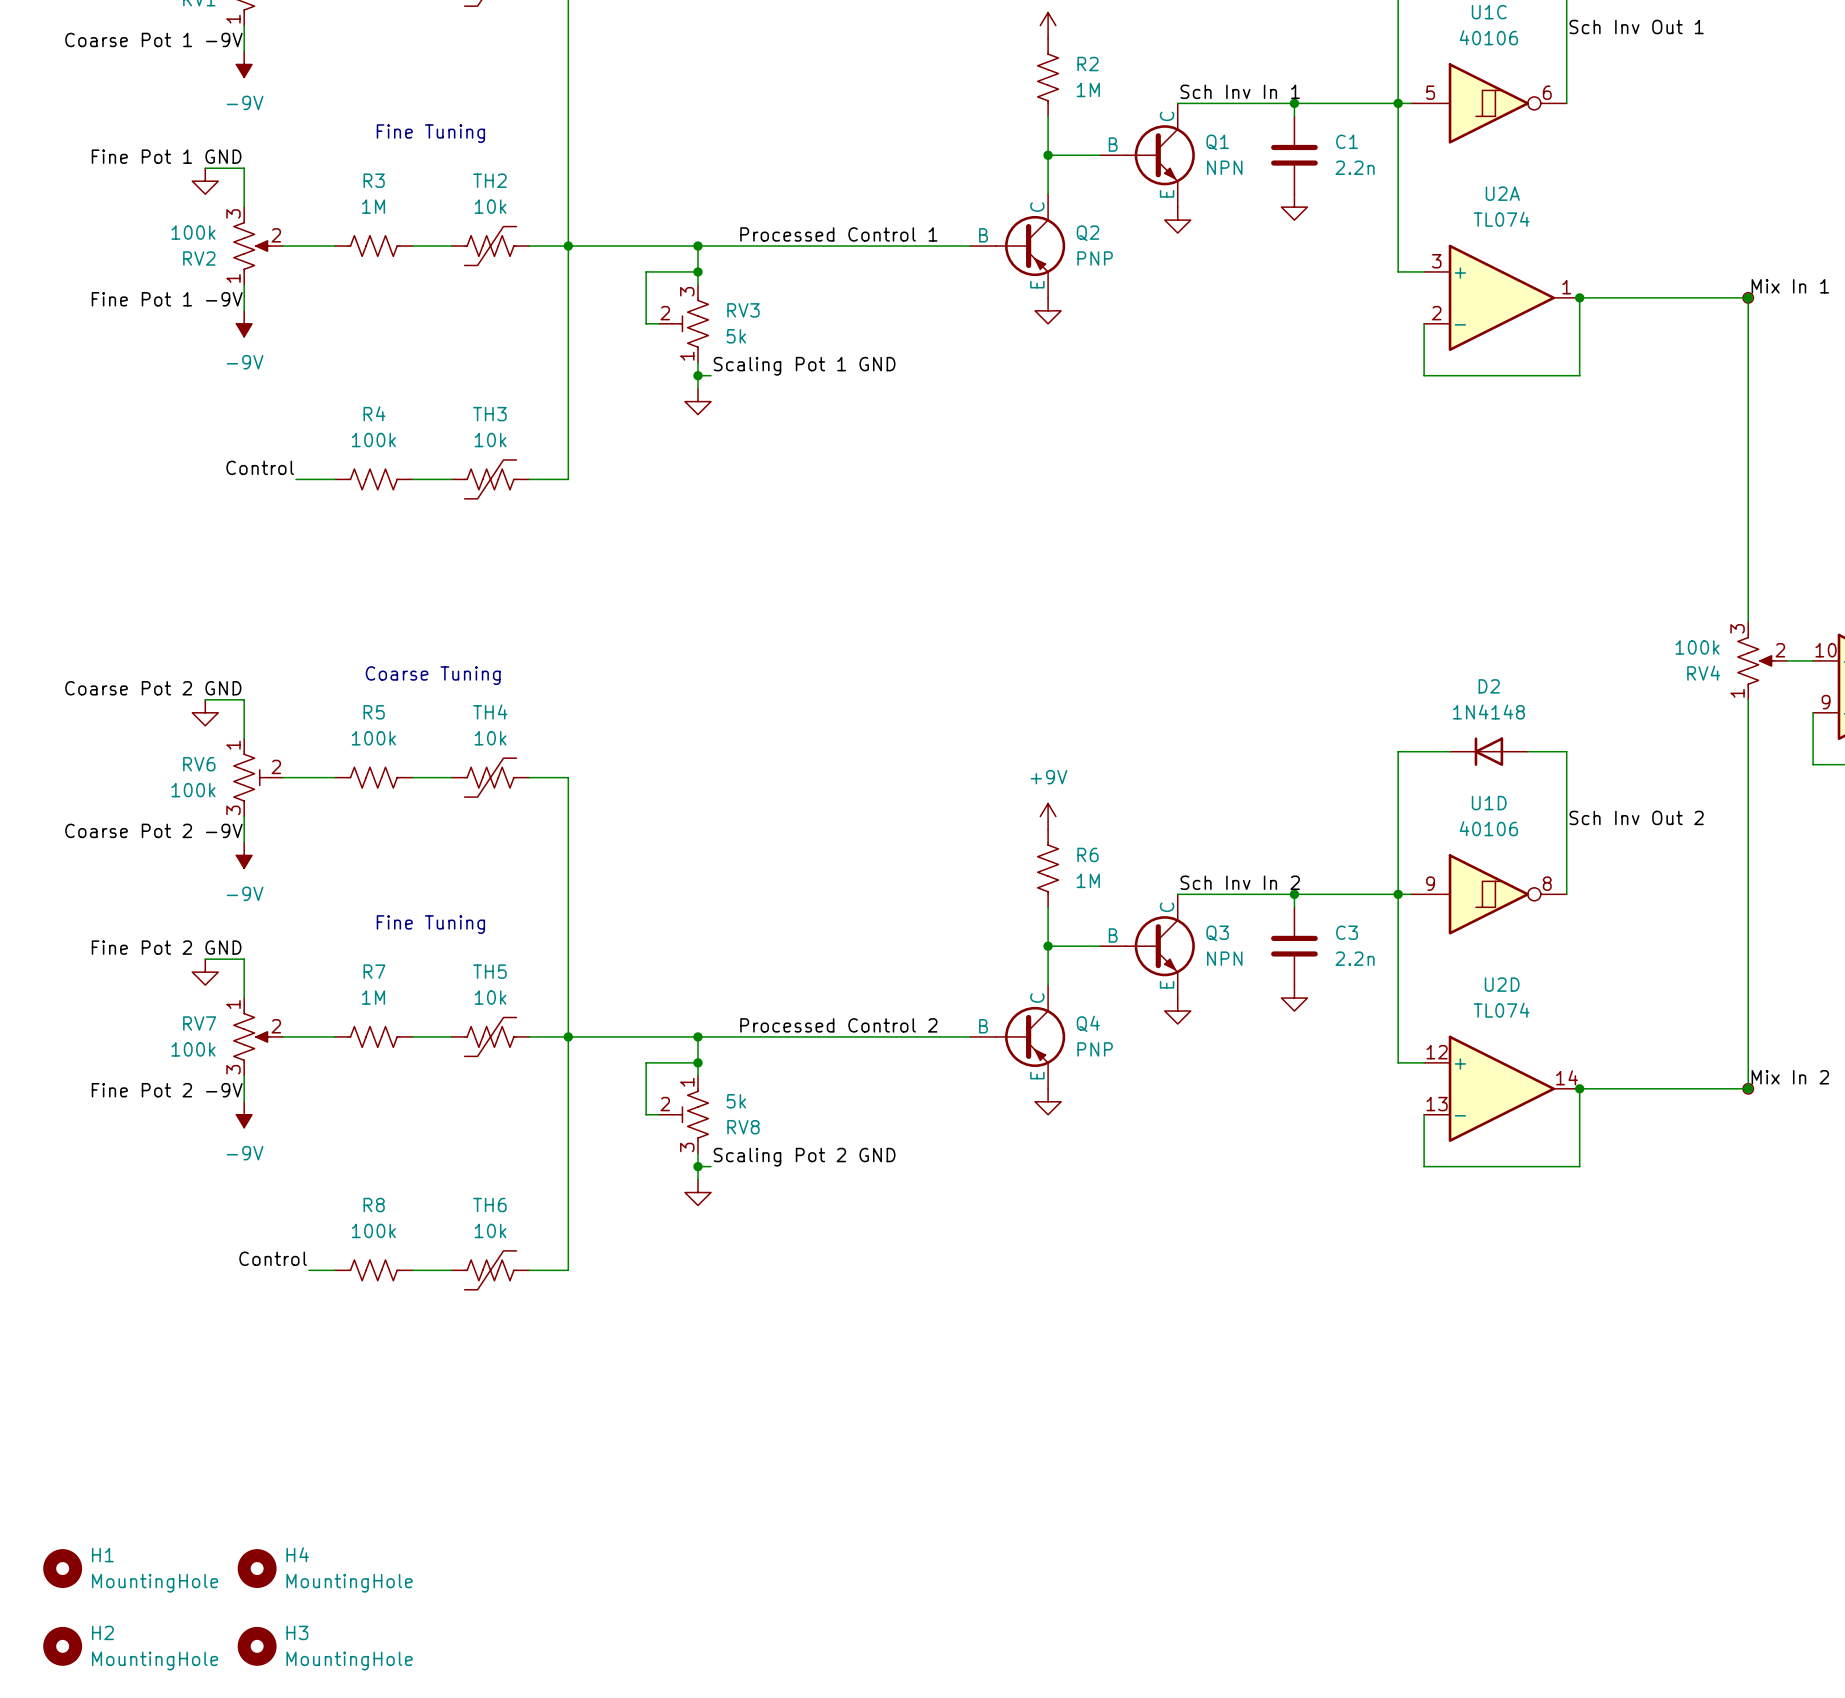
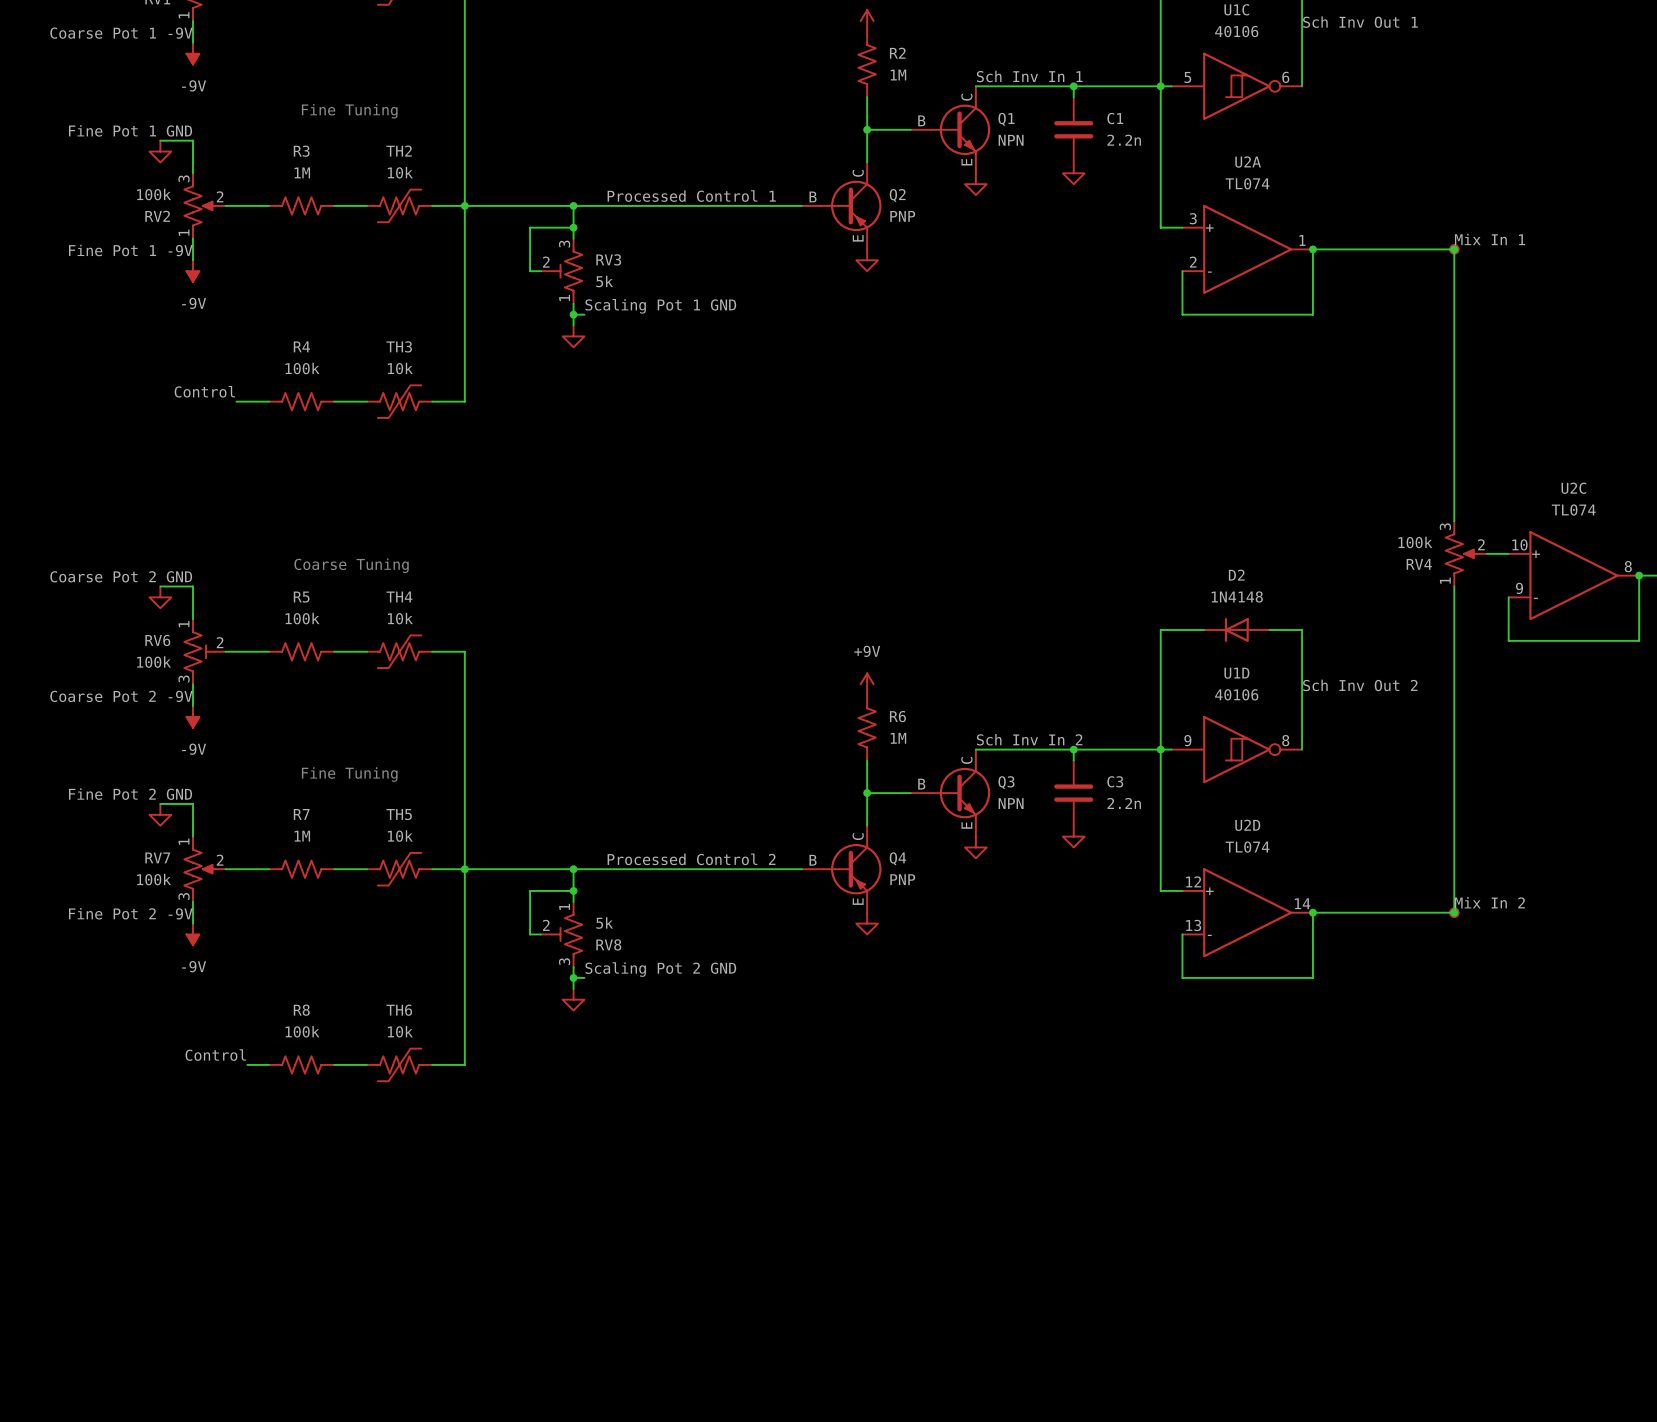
H1: MountingHole (62, 1568) -> none
H4: MountingHole (257, 1568) -> none
H2: MountingHole (62, 1646) -> none
H3: MountingHole (257, 1646) -> none

